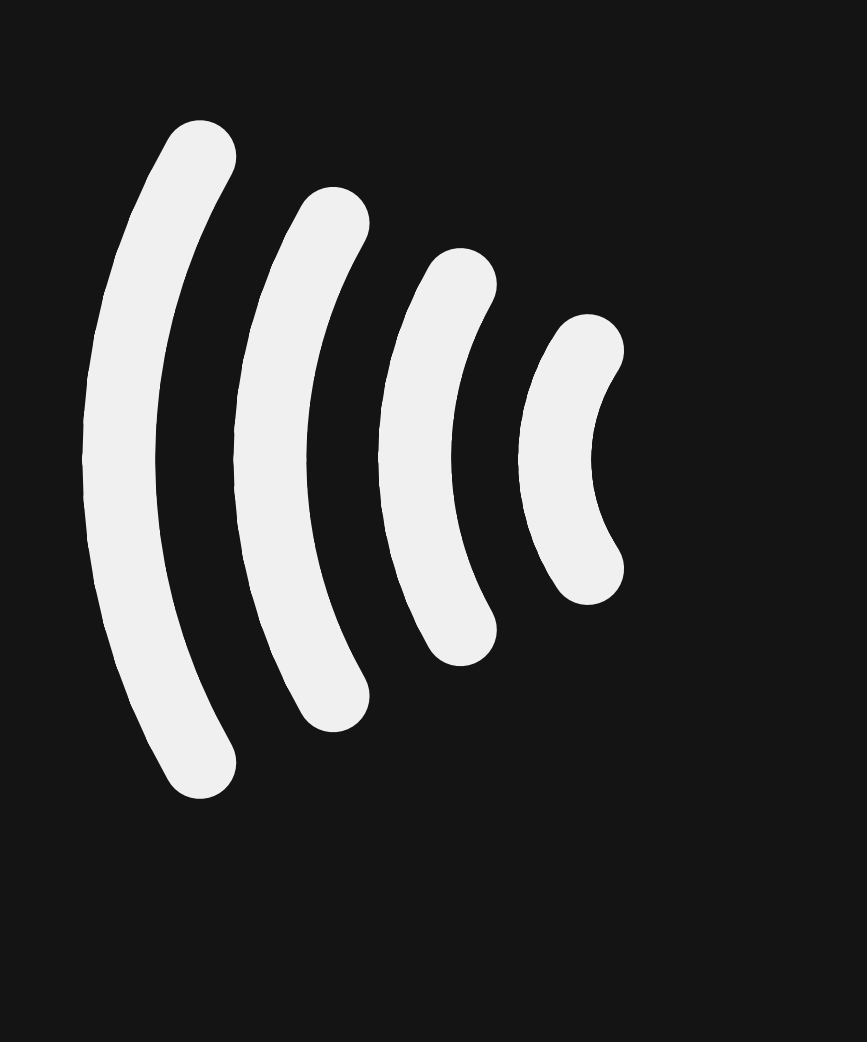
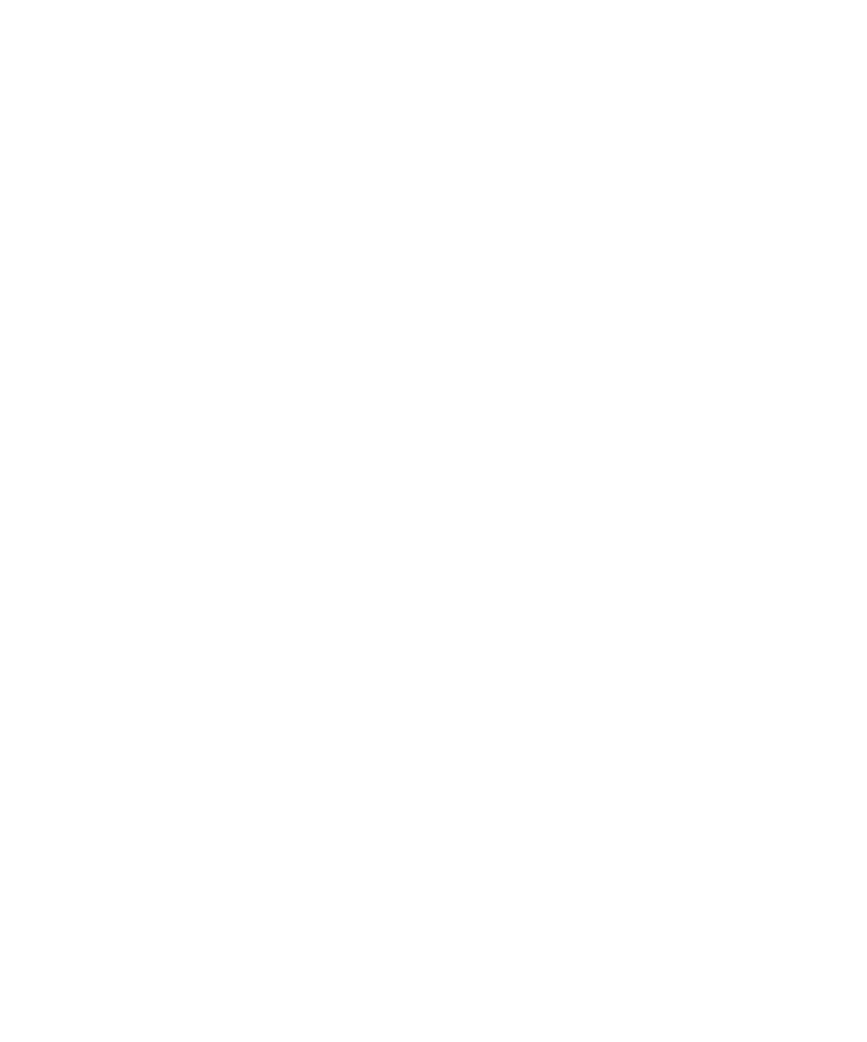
line: (199, 156) (164, 228) (139, 303) (123, 381) (118, 459) (123, 537) (139, 615) (164, 690) (199, 762) -> none
line: (333, 223) (305, 279) (285, 338) (273, 398) (269, 459) (273, 520) (285, 580) (305, 639) (333, 695) -> none
line: (460, 284) (440, 325) (426, 368) (417, 412) (414, 457) (417, 501) (426, 545) (440, 588) (460, 629) -> none
line: (587, 350) (573, 376) (562, 403) (556, 431) (554, 459) (556, 487) (562, 515) (573, 542) (587, 568) -> none

